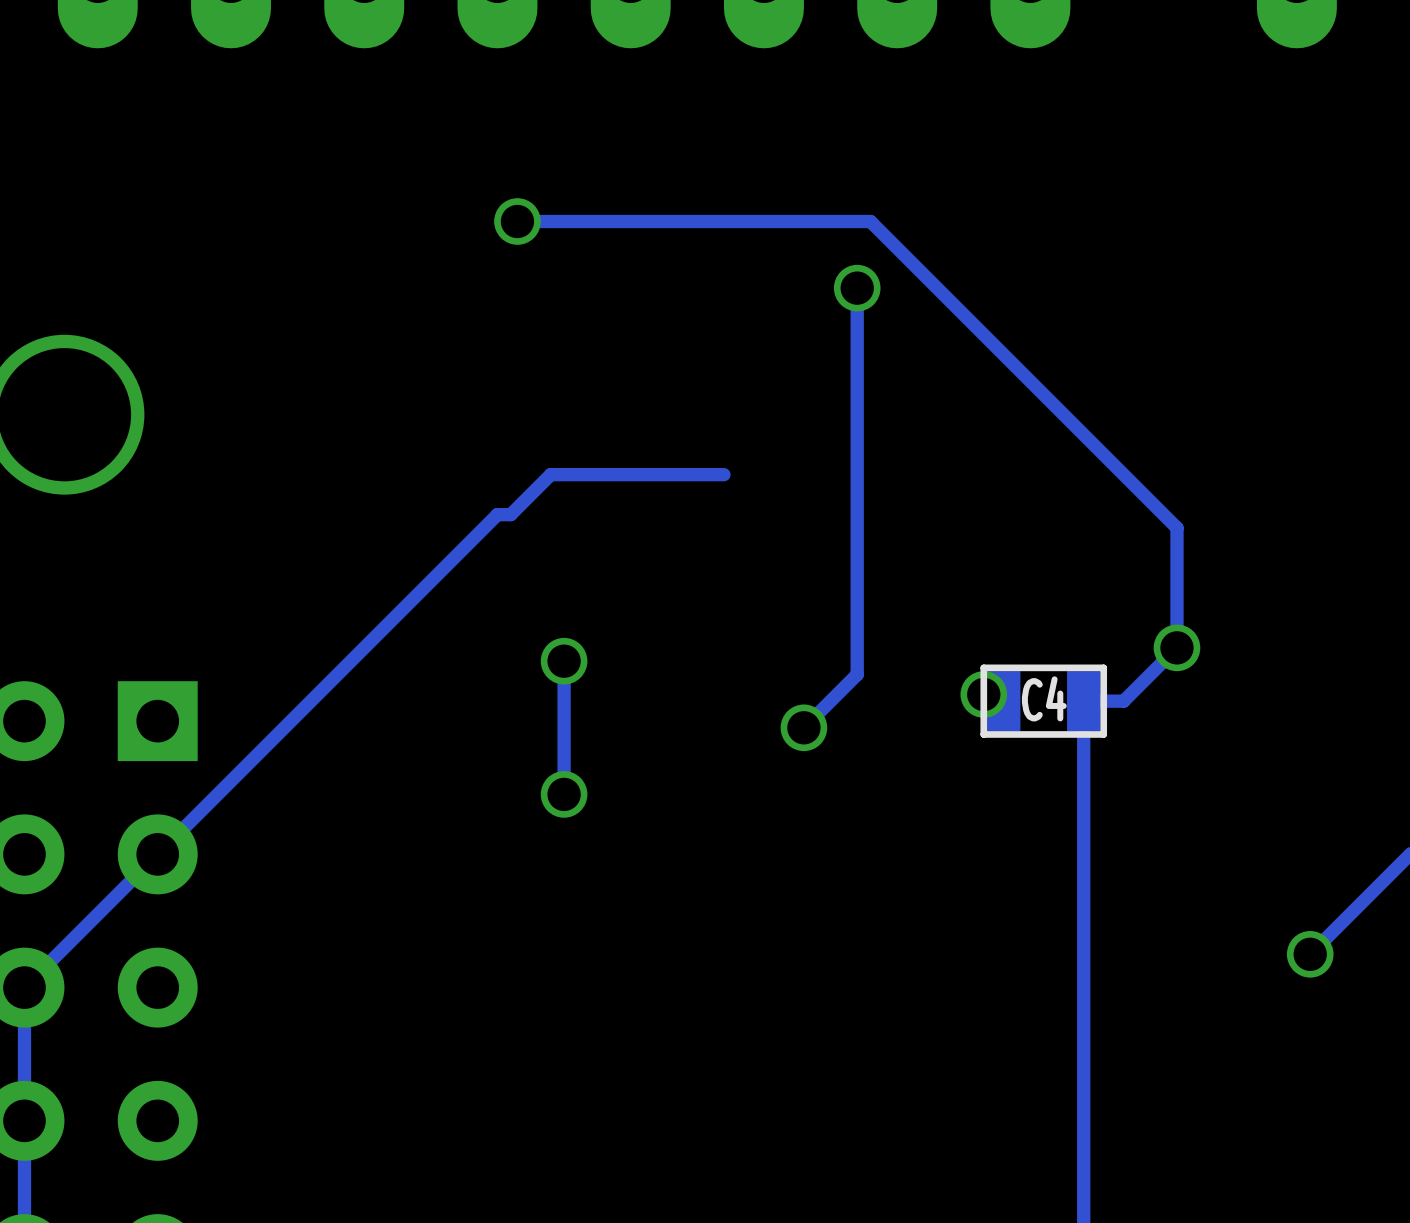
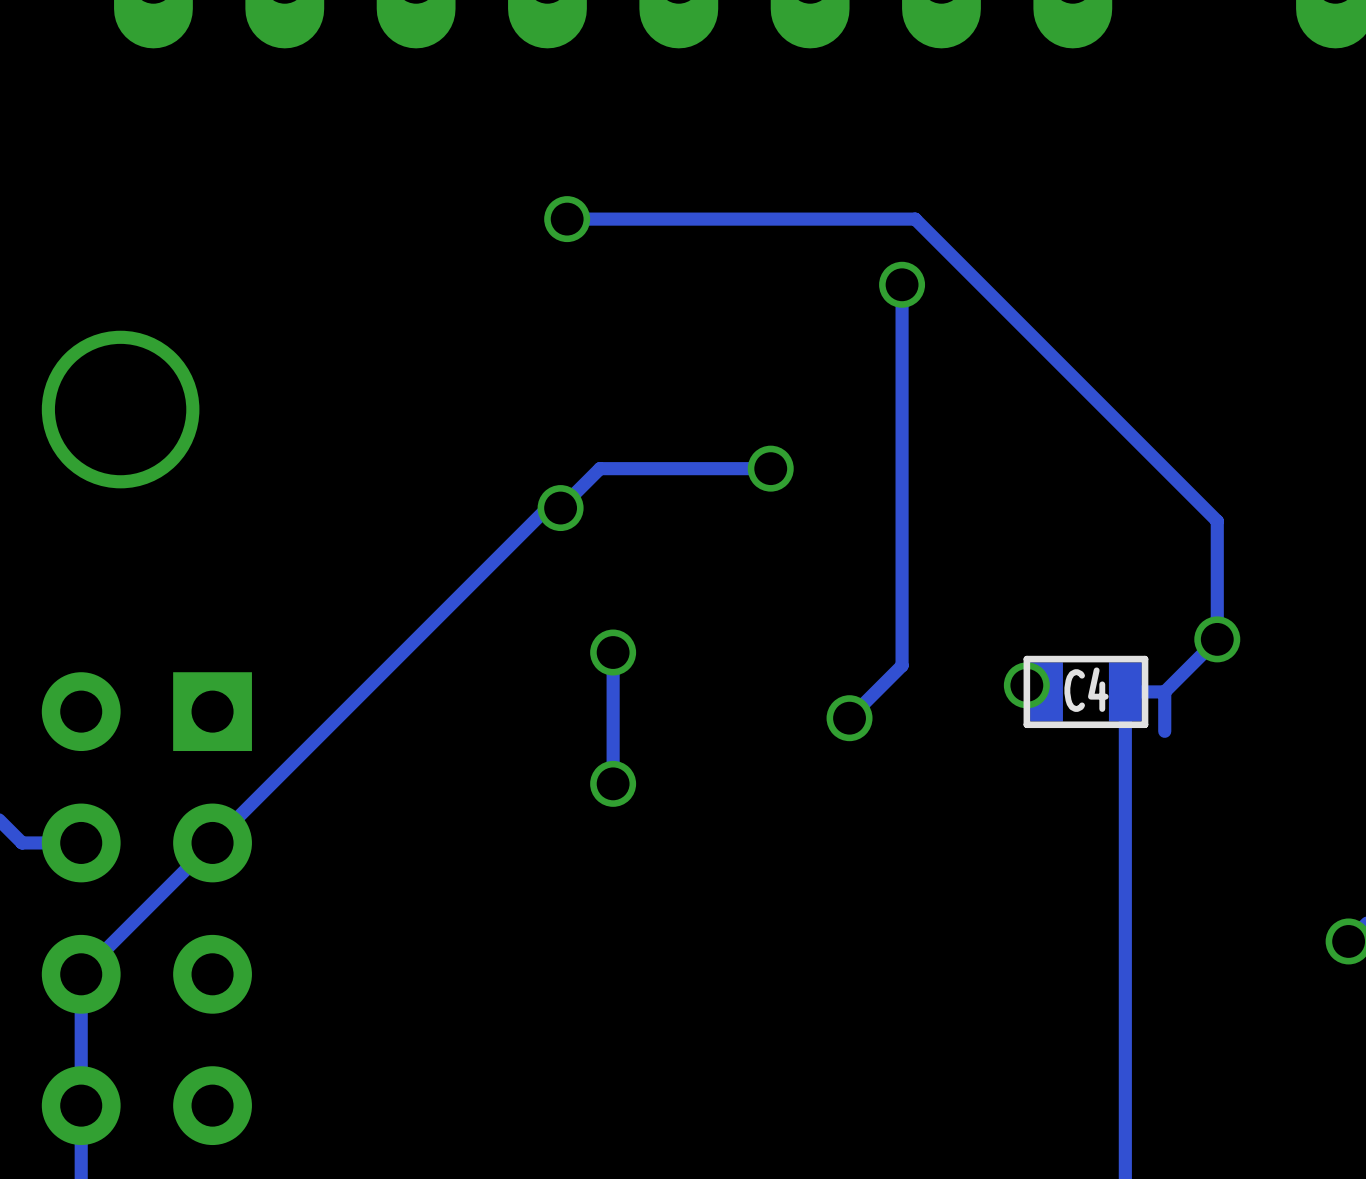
via: none -> (770, 468)
via: none -> (560, 508)
track: none -> (1164, 691) (1164, 731)

